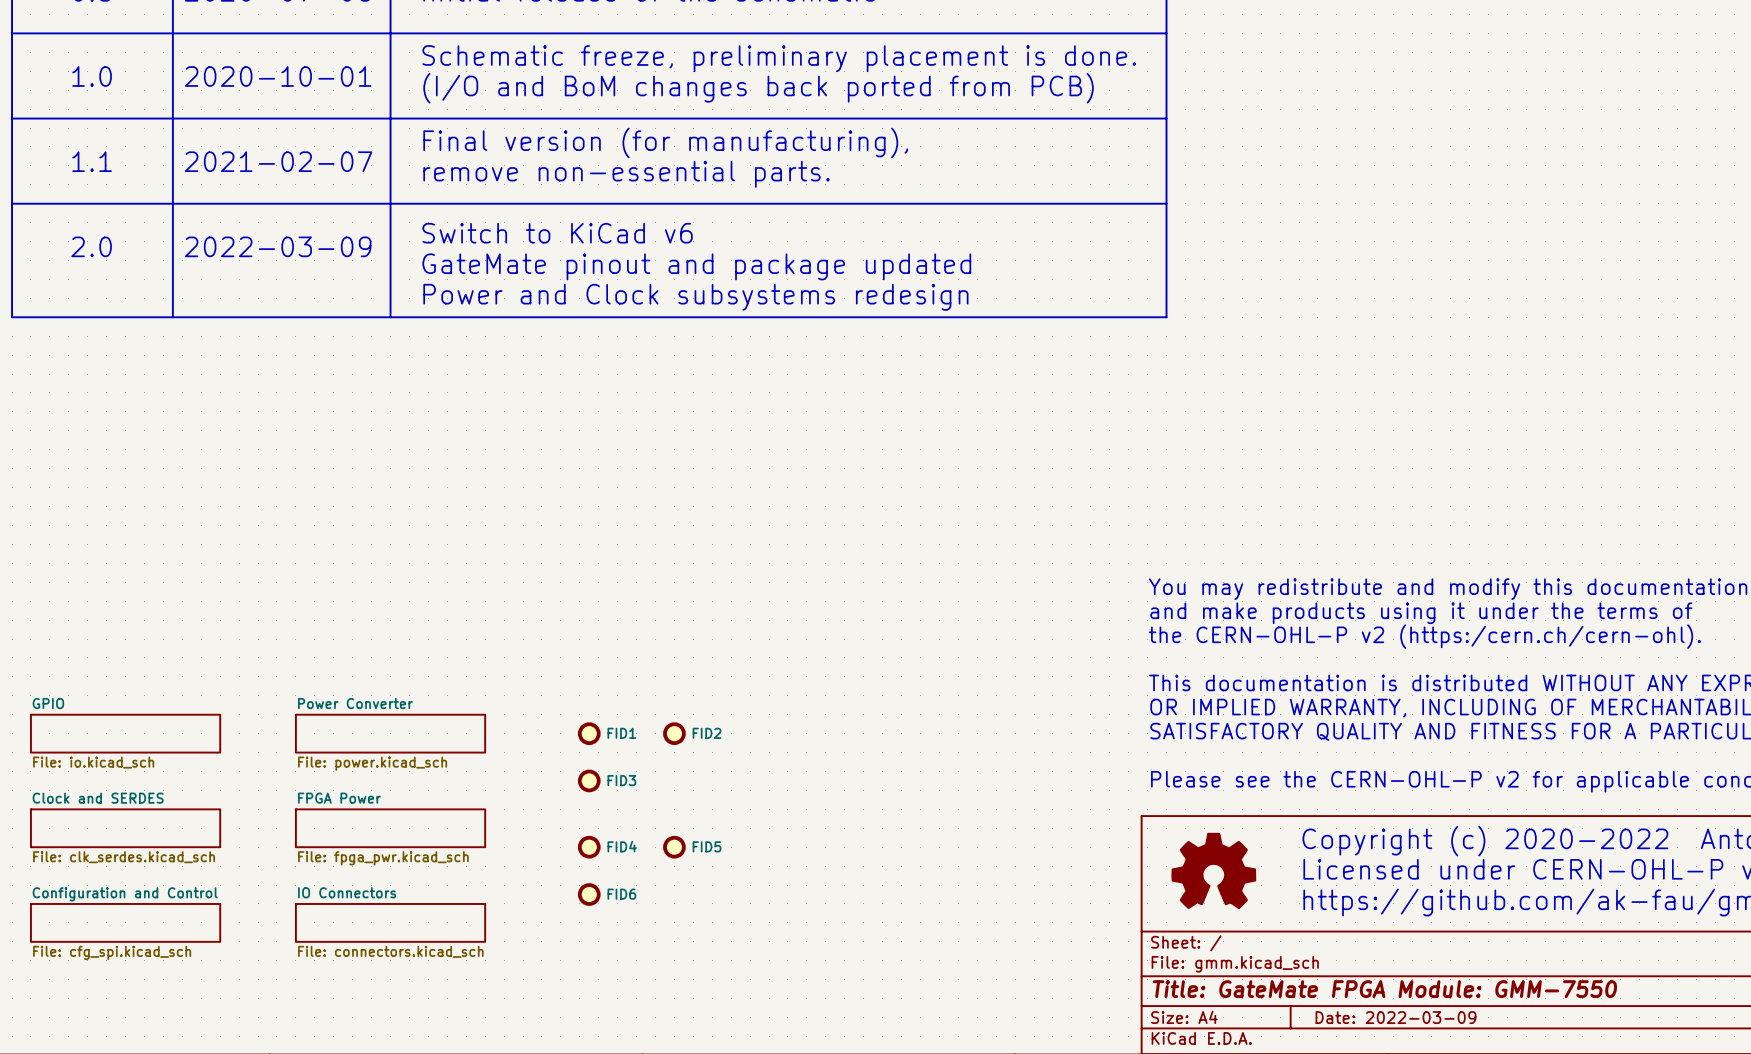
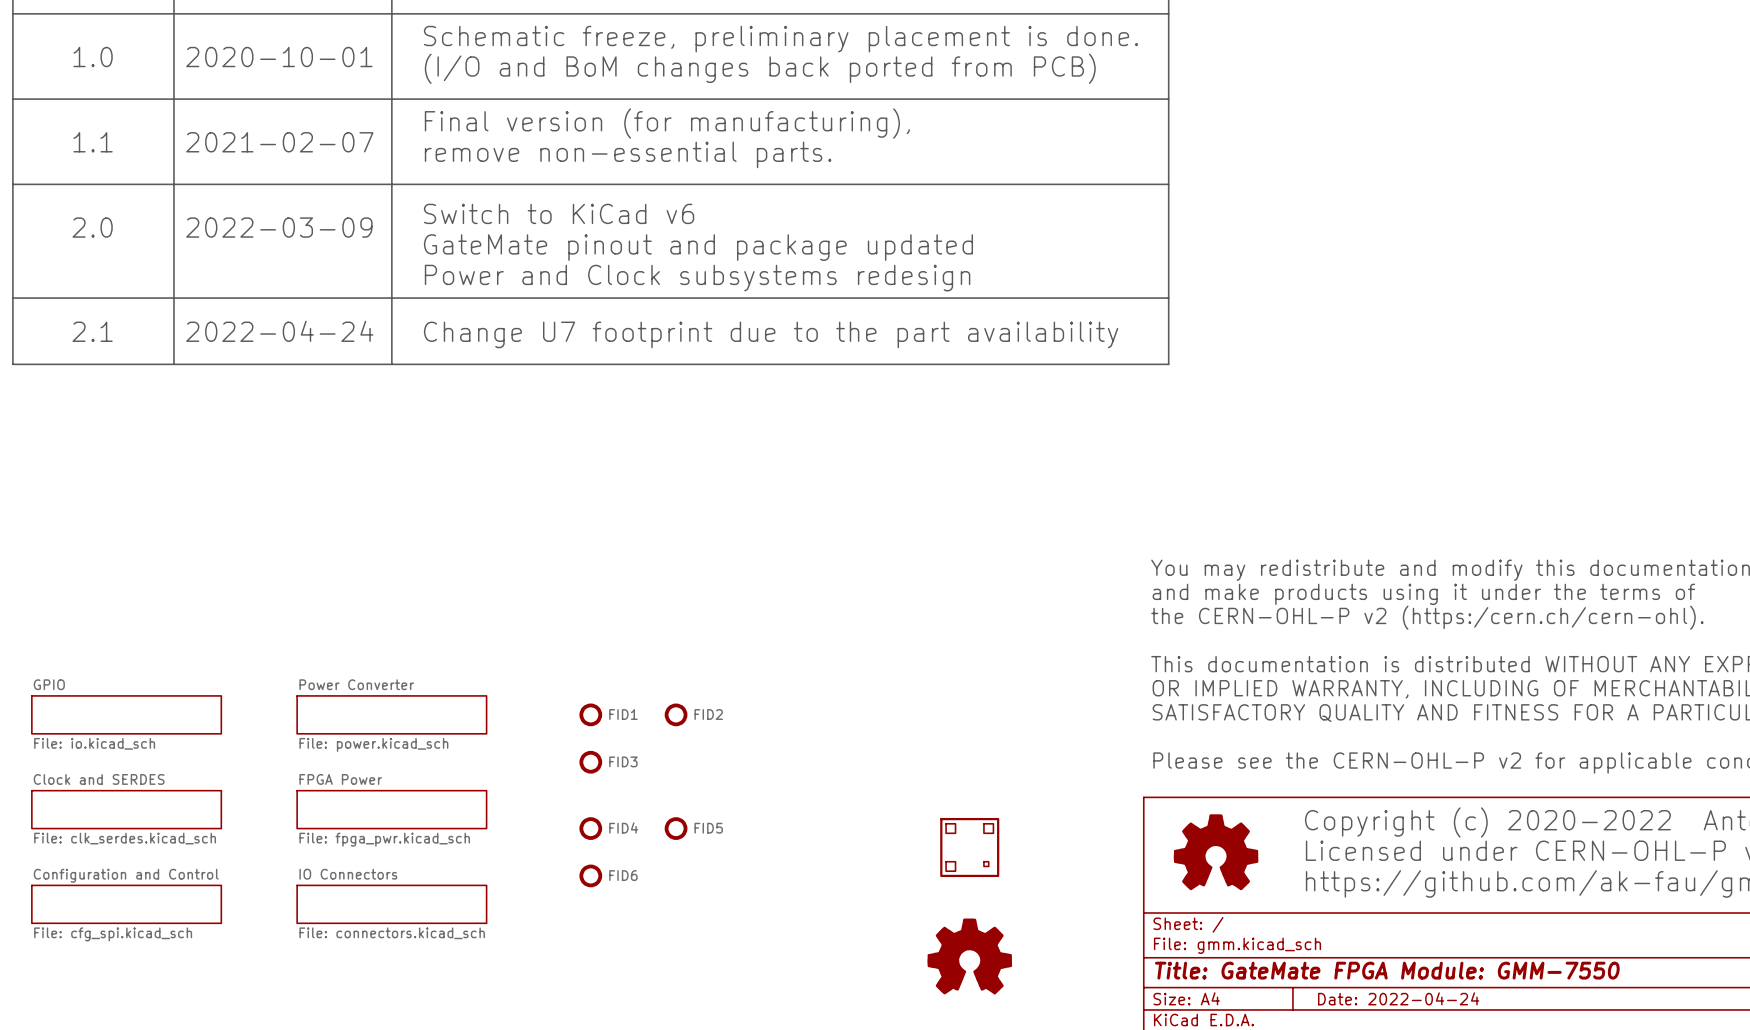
line: none -> (12, 298) (12, 364) (1168, 364) (1168, 298)
line: none -> (173, 298) (173, 364)
line: none -> (391, 298) (391, 364)
text: none -> 2.1 (92, 331)
text: none -> 2022-04-24 (279, 331)
text: none -> Change U7 footprint due to the part availability (771, 334)
part: none -> (969, 847)
part: none -> (969, 956)
title block: Date: 2022-03-09 (1395, 1017) -> Date: 2022-04-24 (1398, 998)

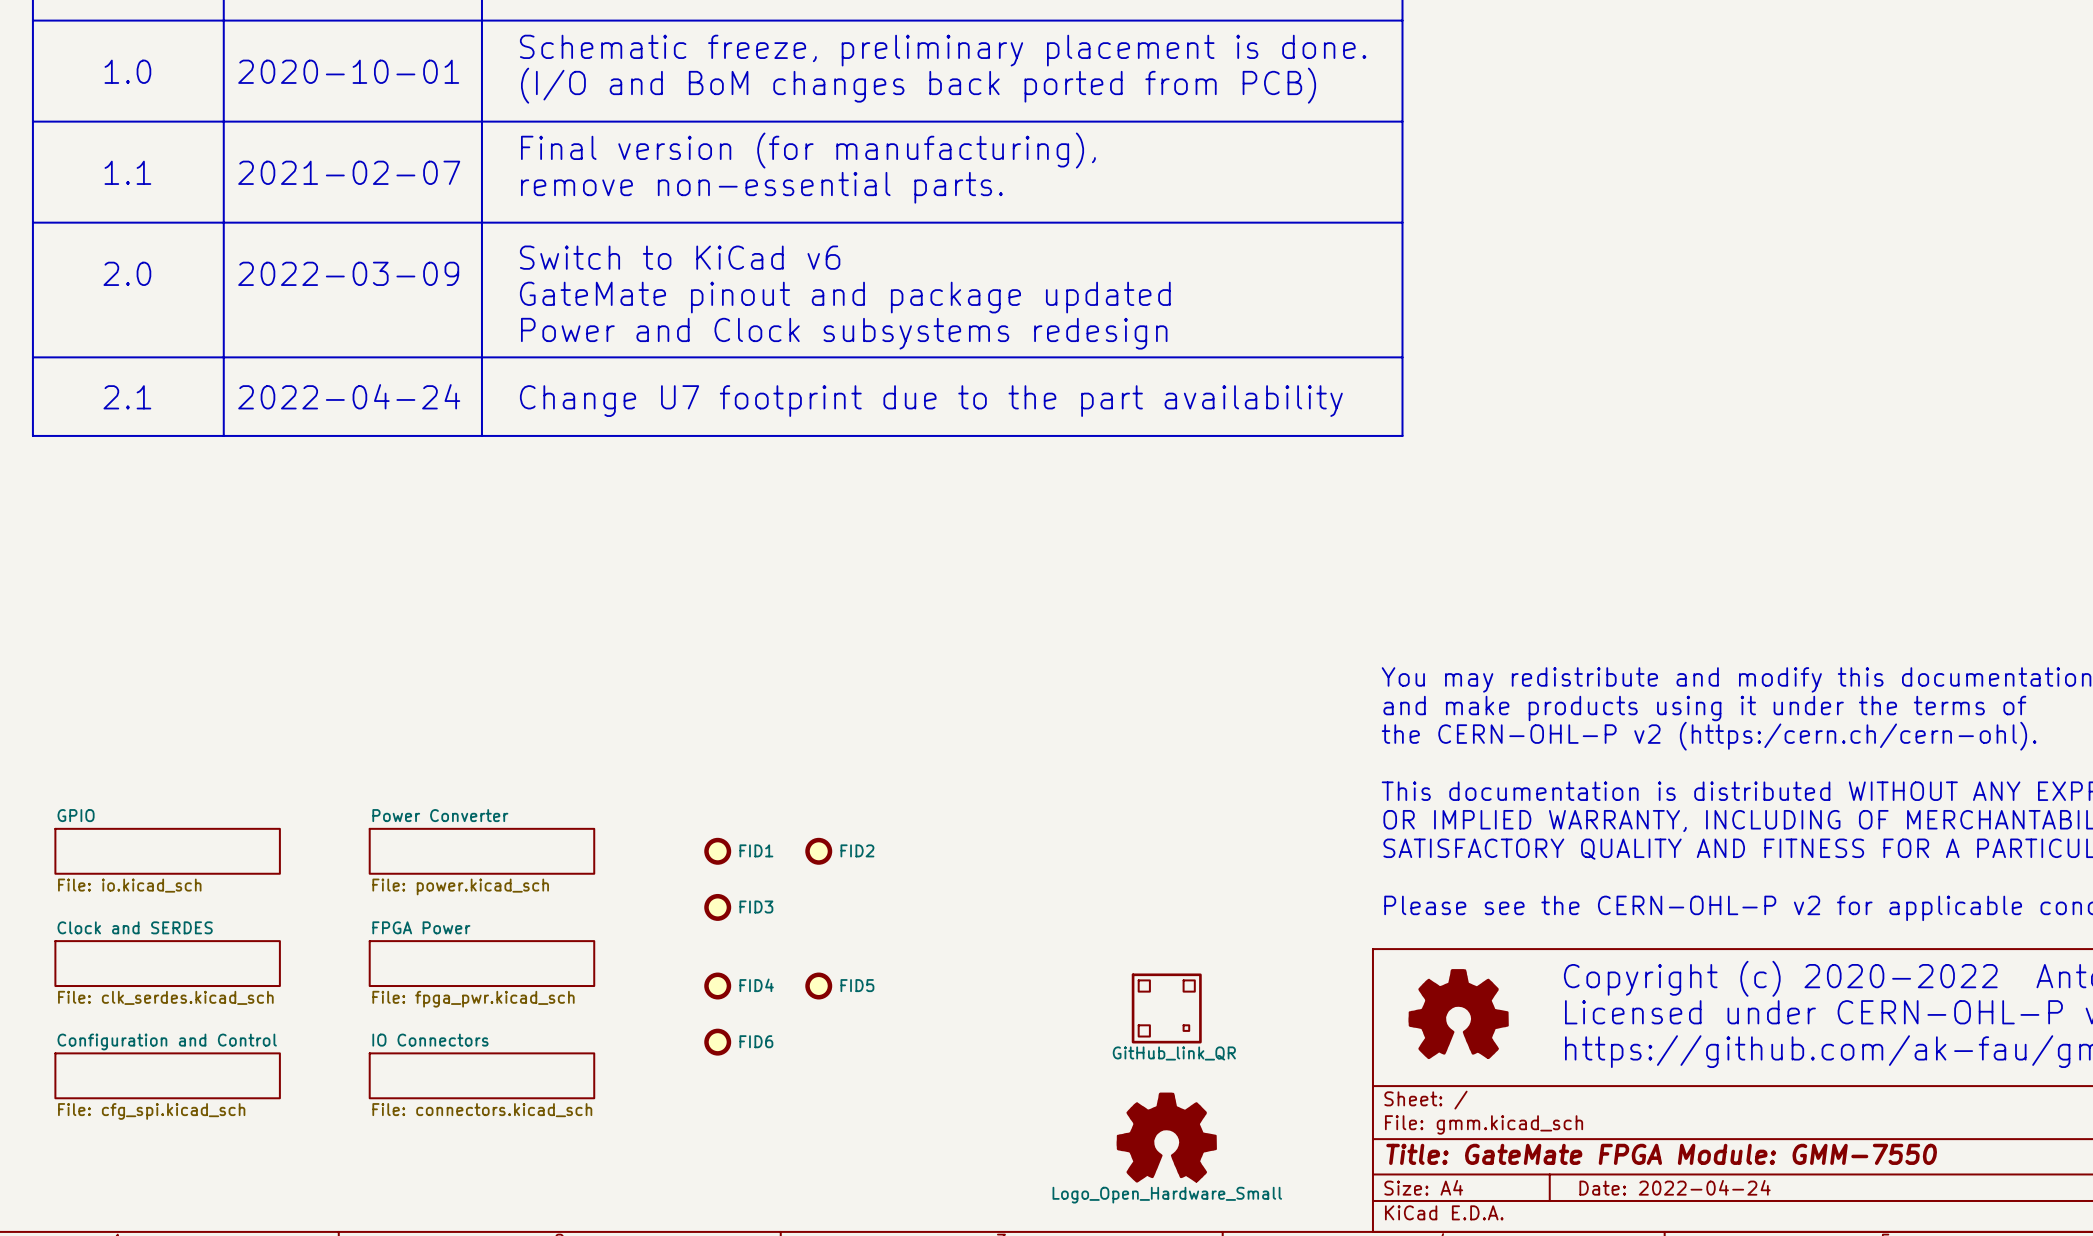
part value: none -> GitHub_link_QR (1174, 1053)
part value: none -> Logo_Open_Hardware_Small (1167, 1195)

